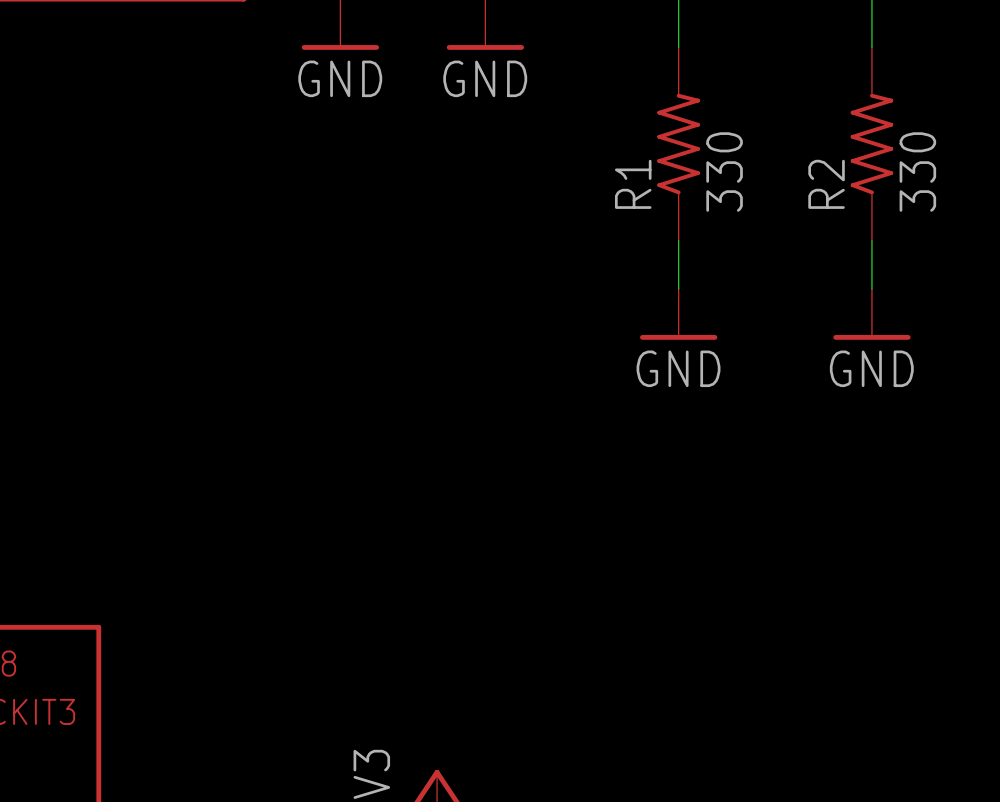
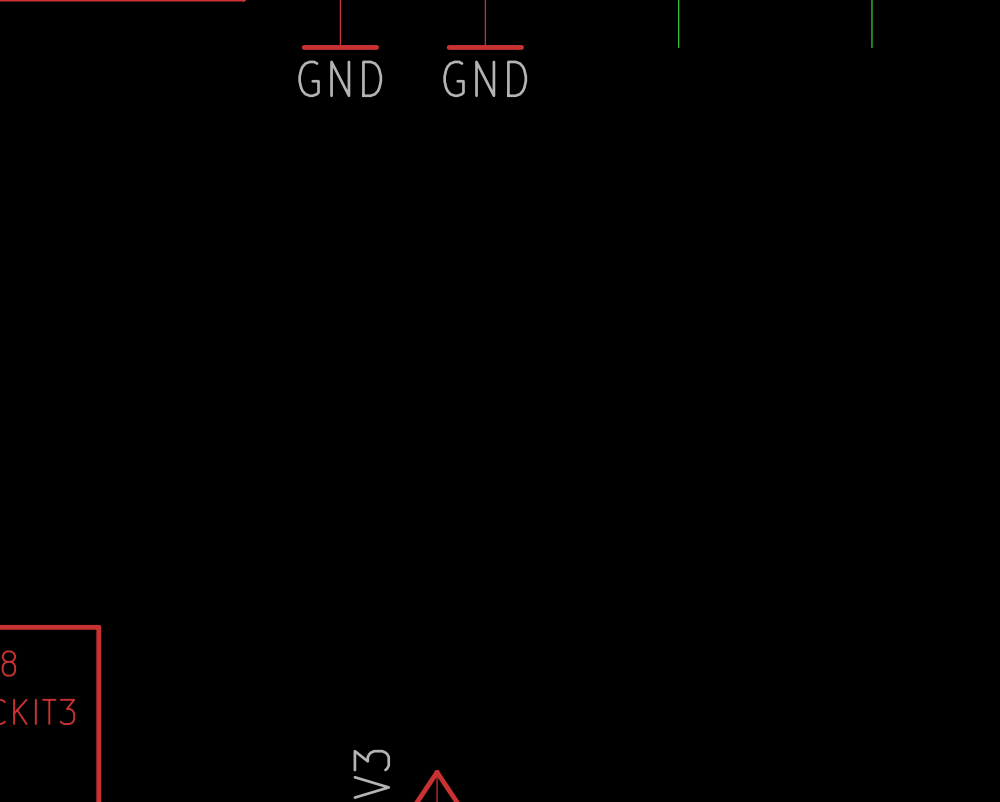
R1: 330 (678, 144) -> none
R2: 330 (871, 144) -> none
wire: (678, 240) (678, 289) -> none
wire: (871, 240) (871, 289) -> none
power symbol: GND (678, 314) -> none
power symbol: GND (871, 314) -> none

